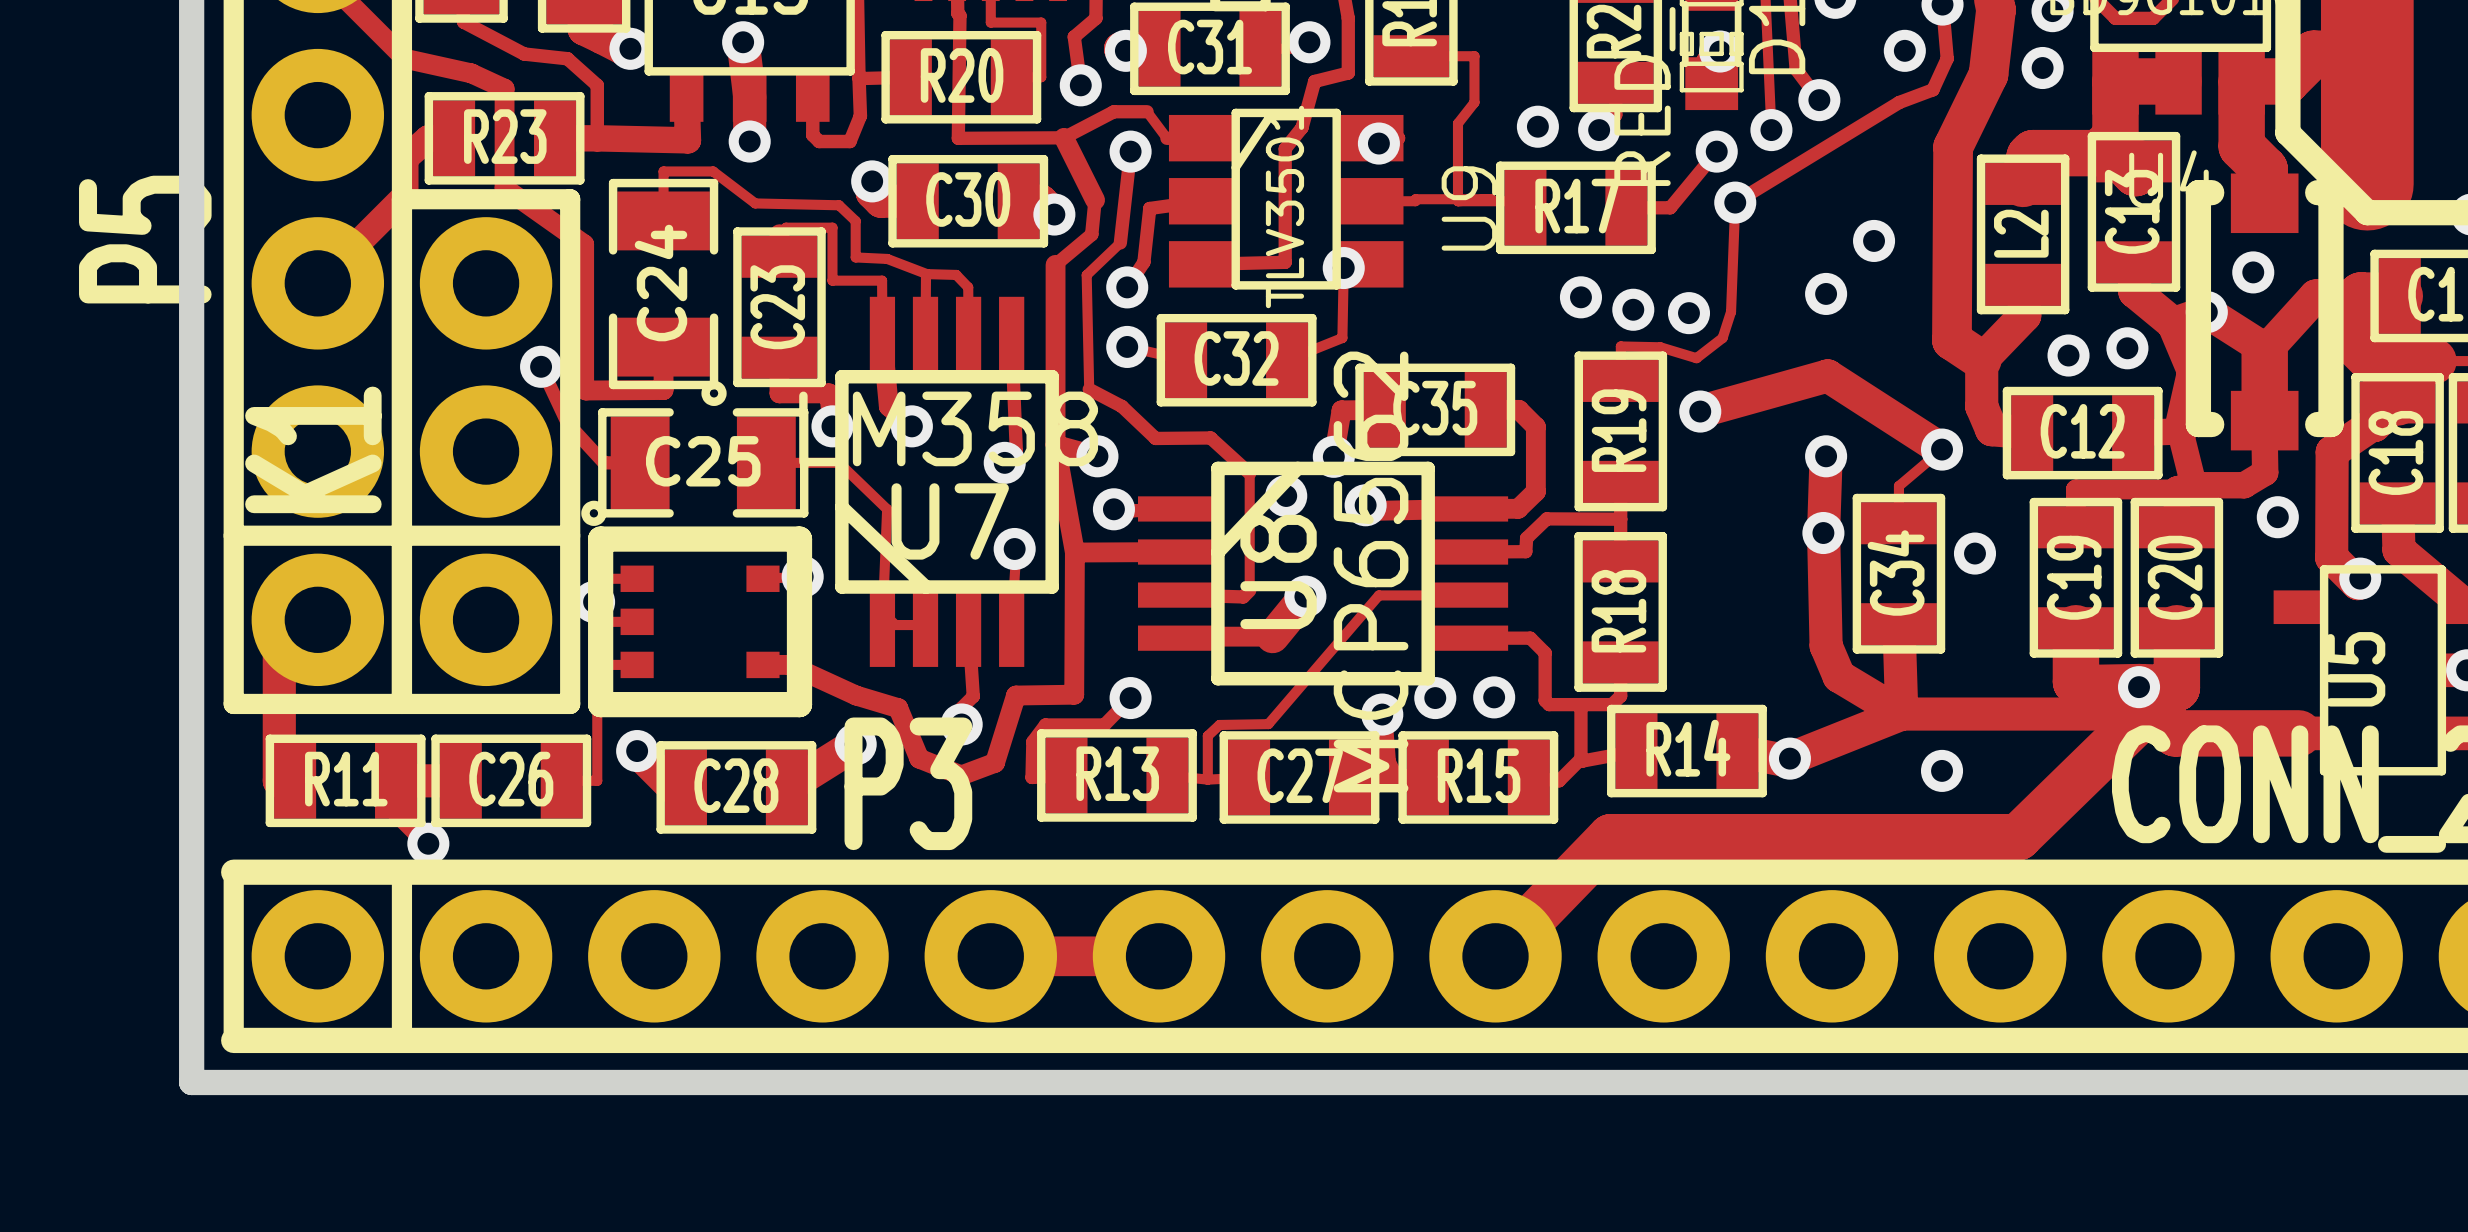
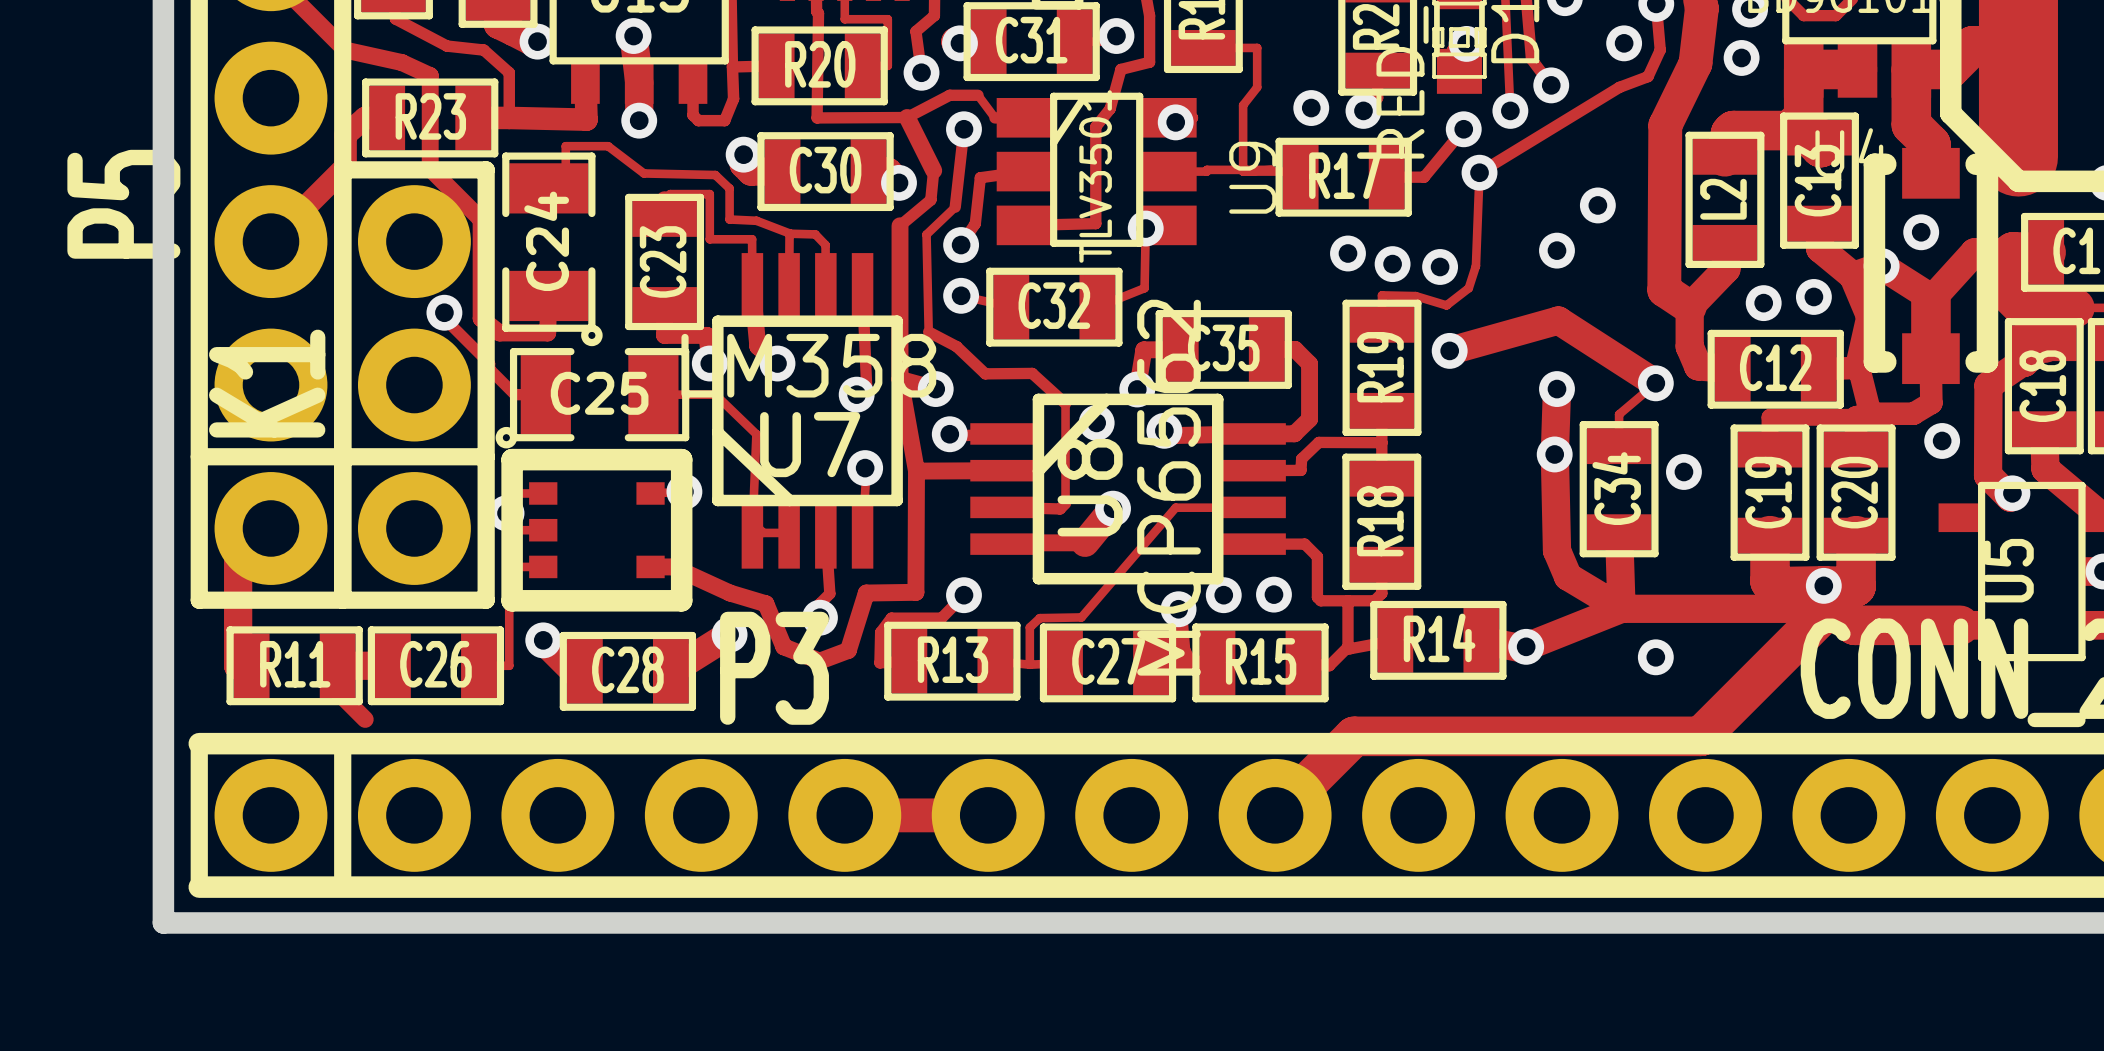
track: (504, 187) (584, 244) (584, 389) (663, 390) (663, 347) -> (430, 160) (430, 168) (481, 219) (481, 318) (499, 332) (547, 332) (548, 295)
C24 position: (667, 292) -> (552, 249)
track: (541, 366) (567, 423) (604, 462) -> (444, 312) (444, 318) (489, 363) (489, 369) (514, 394)
via position: (541, 366) -> (444, 312)
track: (2137, 721) (2018, 837) (1610, 837) (1495, 956) -> (1822, 614) (1700, 736) (1354, 736) (1275, 815)
via: (428, 843) -> none

